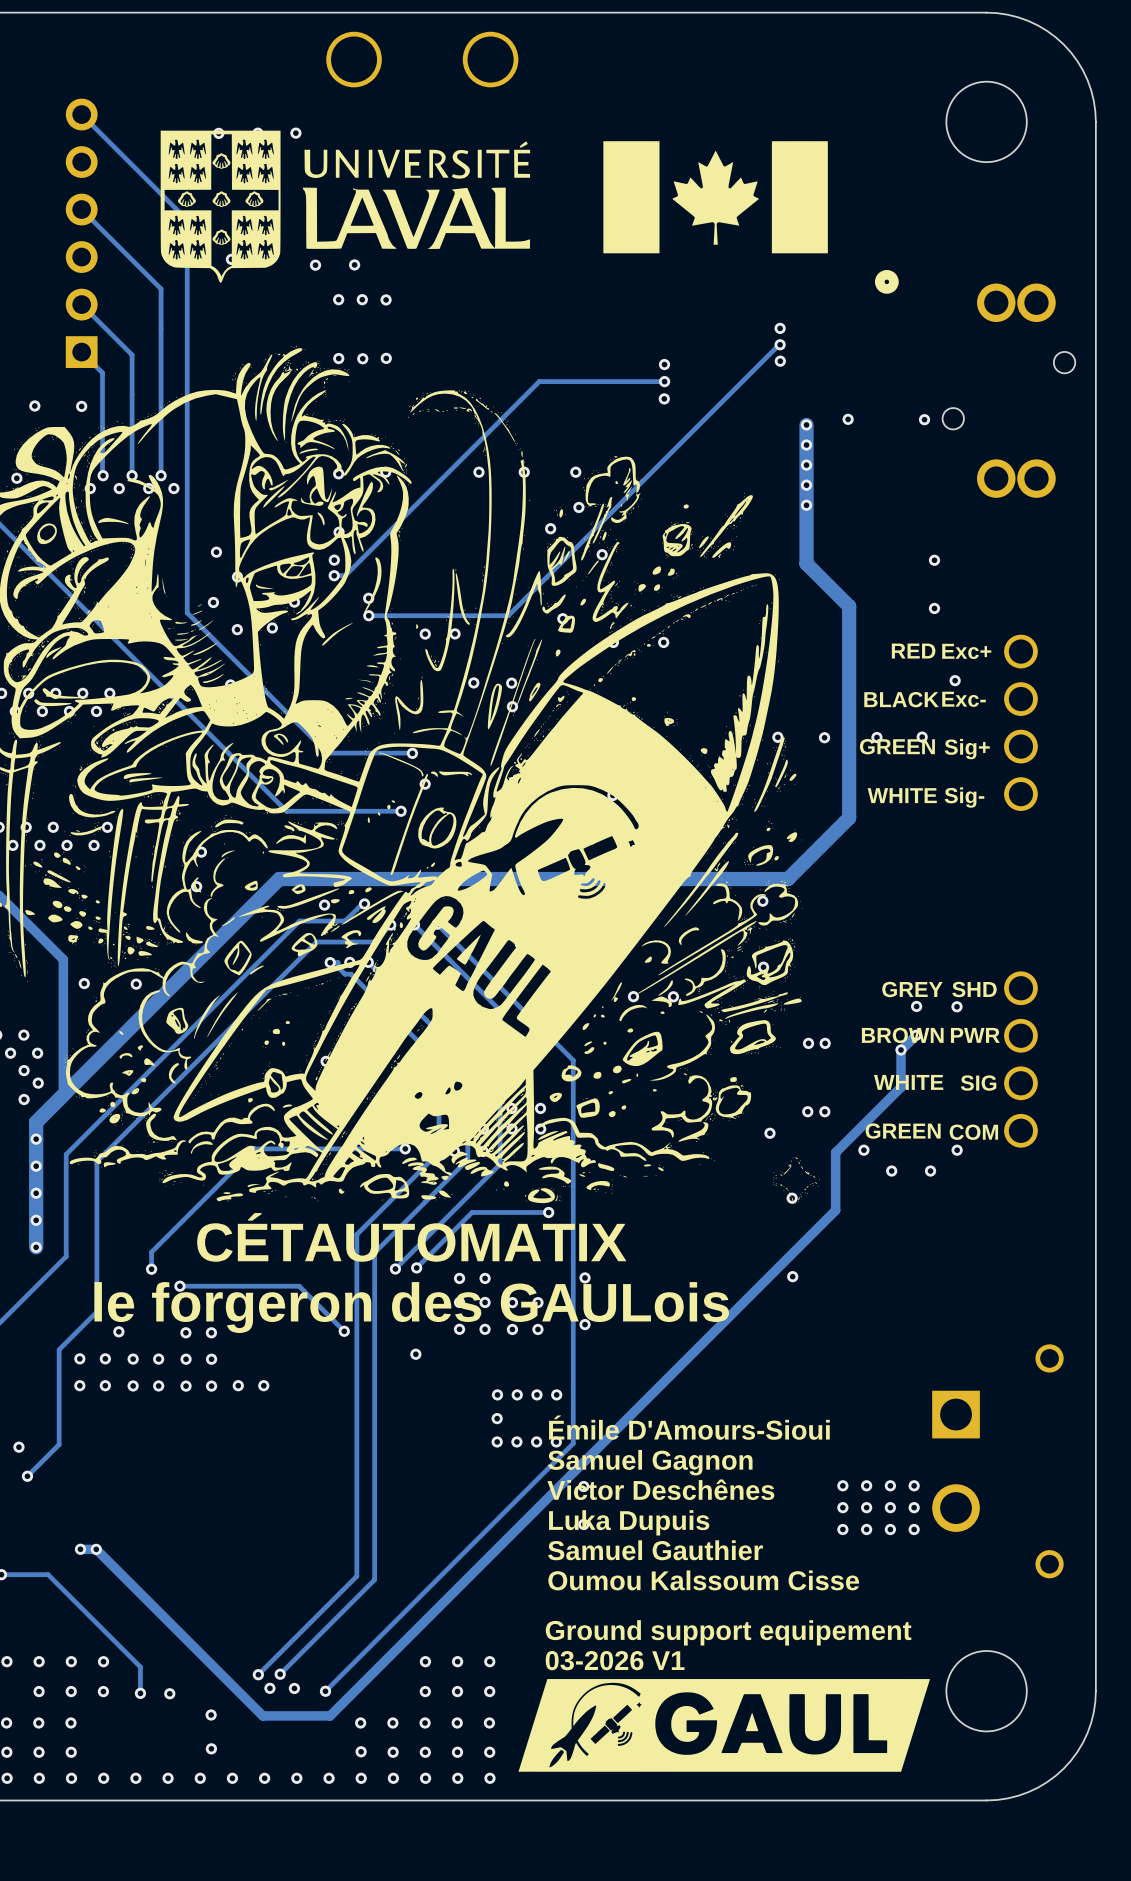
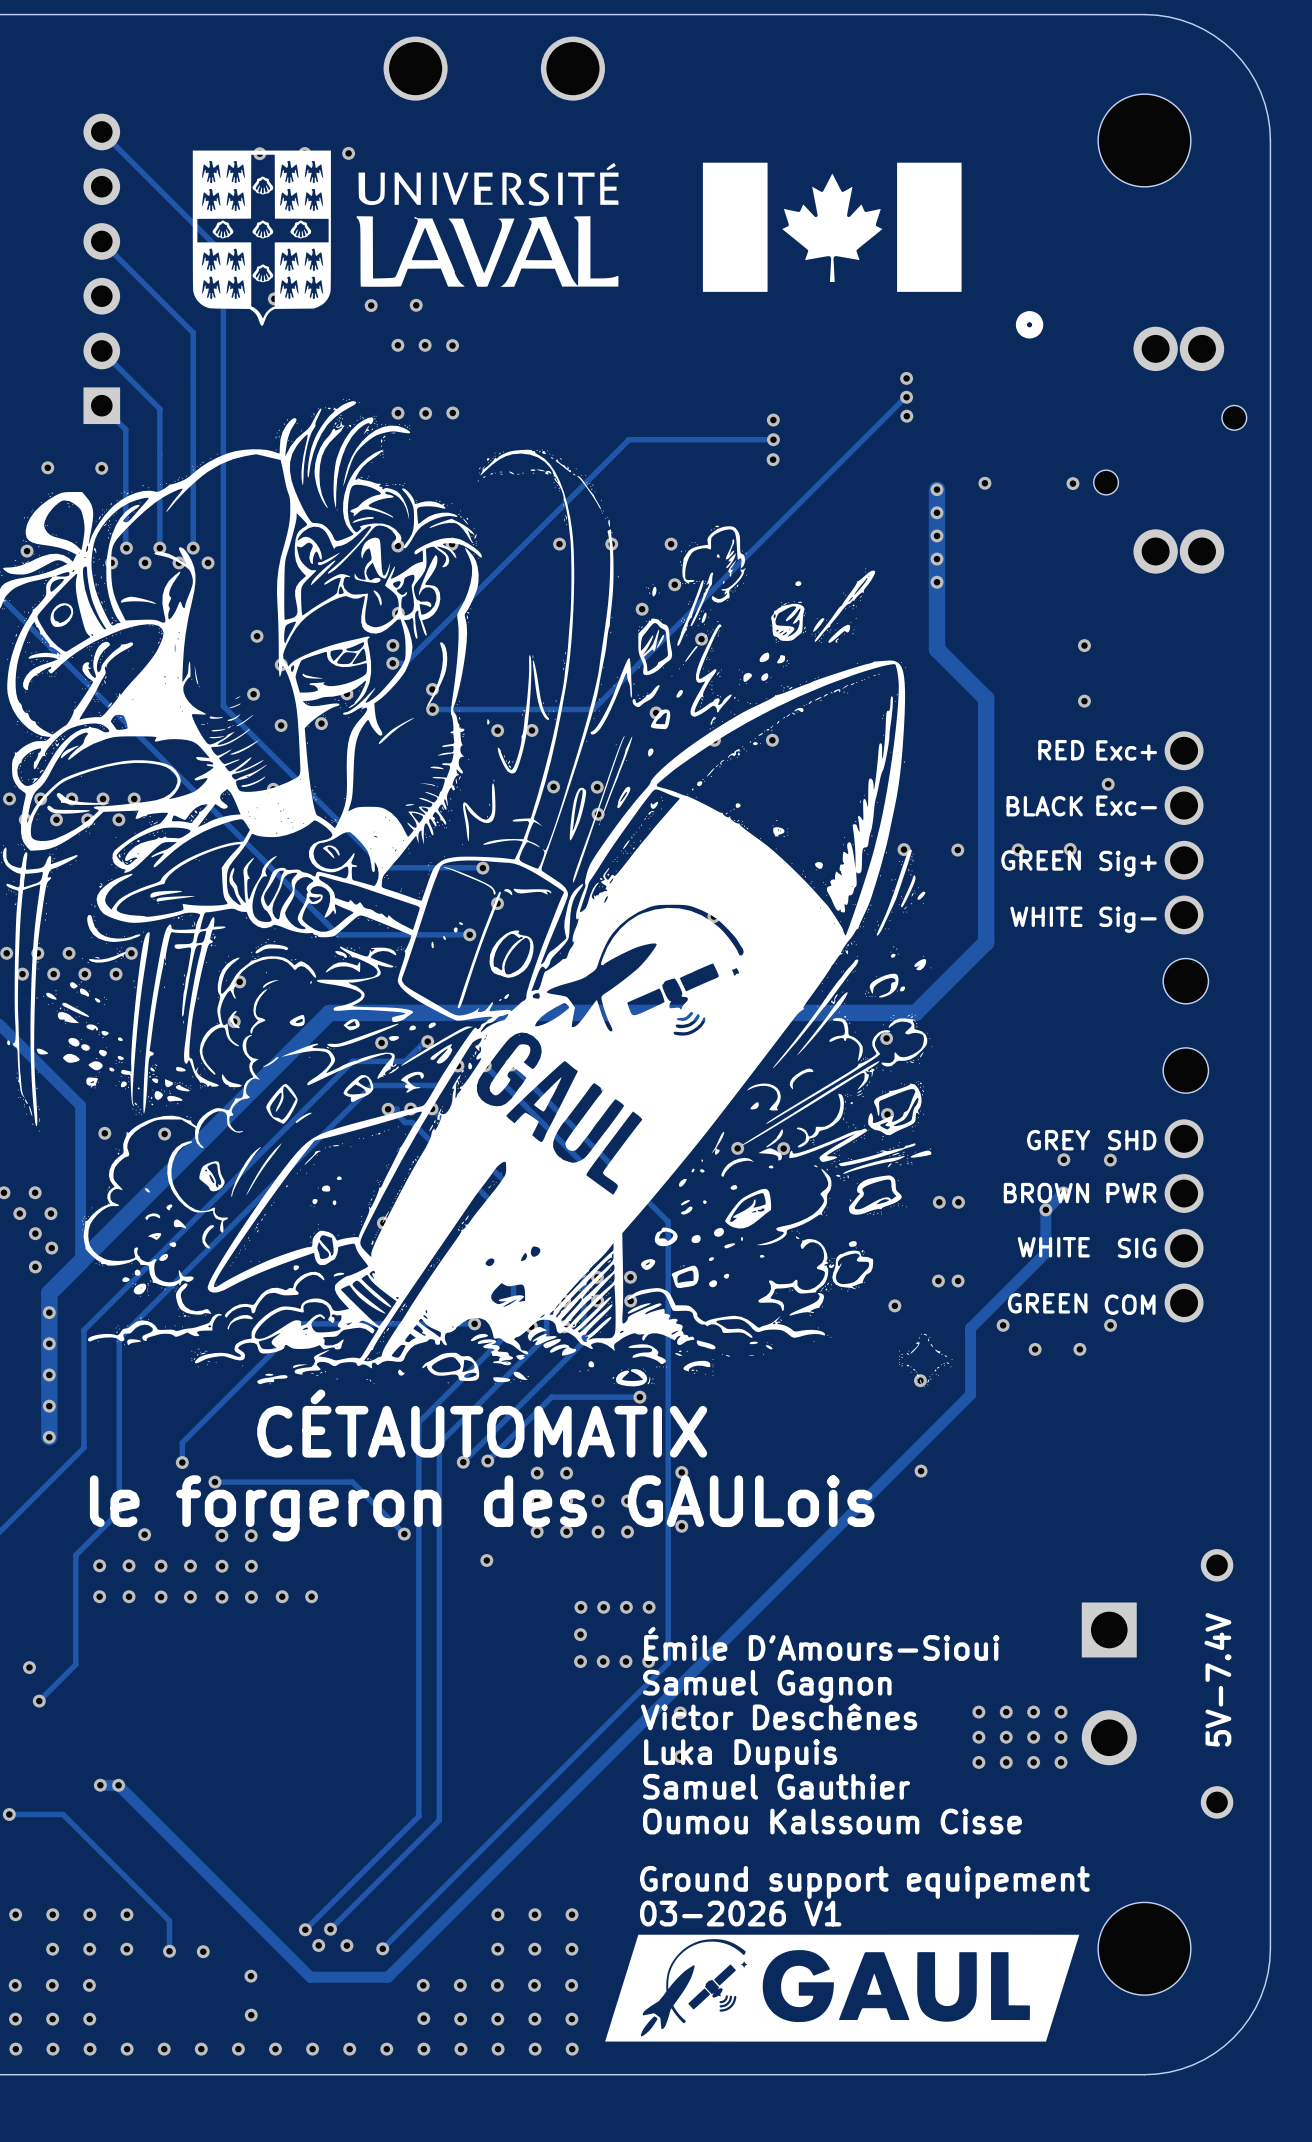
part: none -> (1185, 981)
part: none -> (1185, 1070)
text: none -> 5V-7.4V (1217, 1679)

